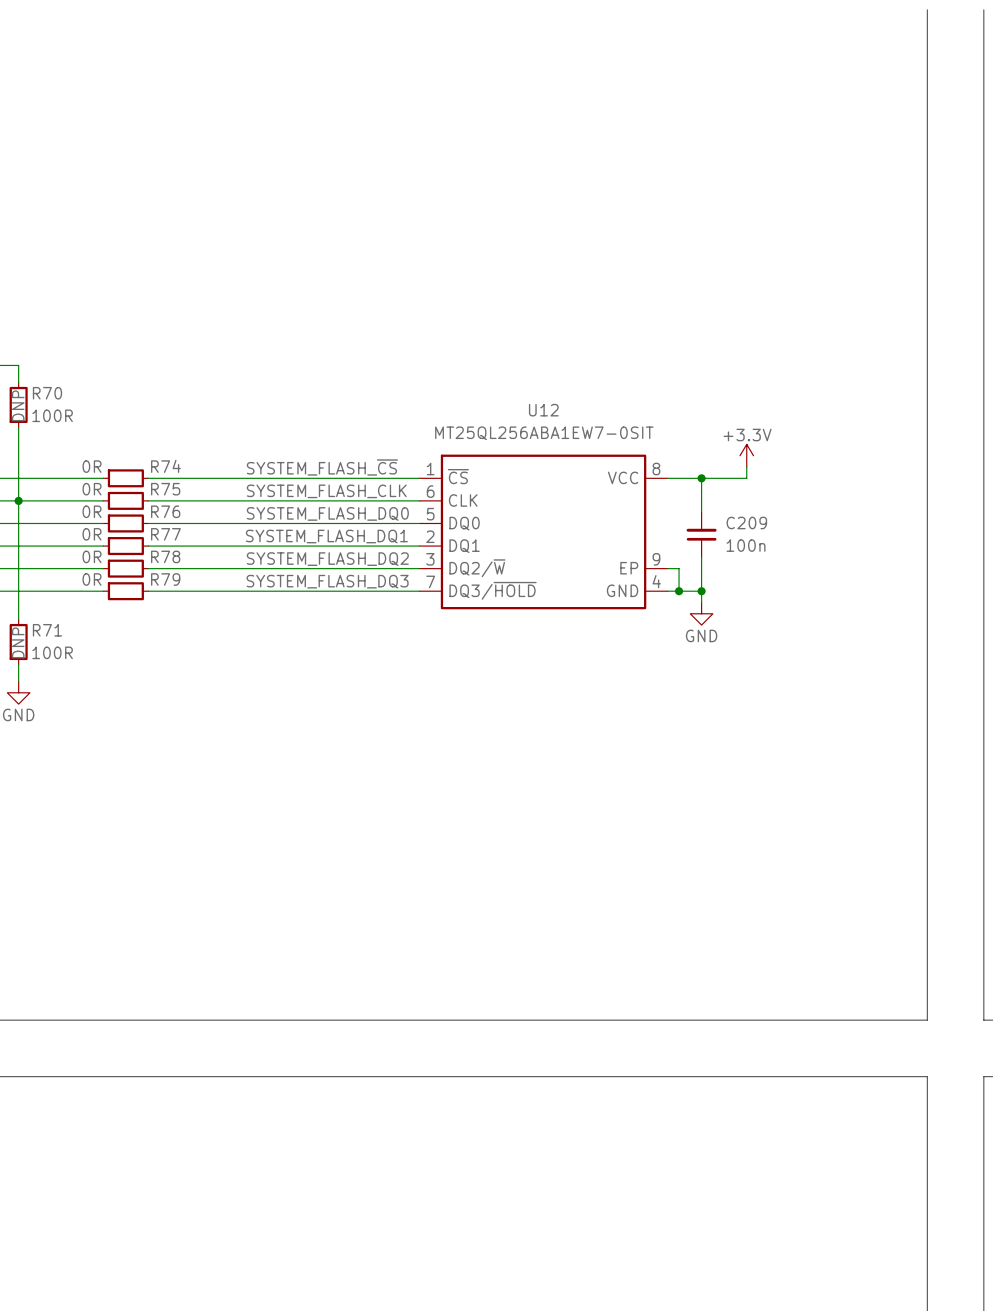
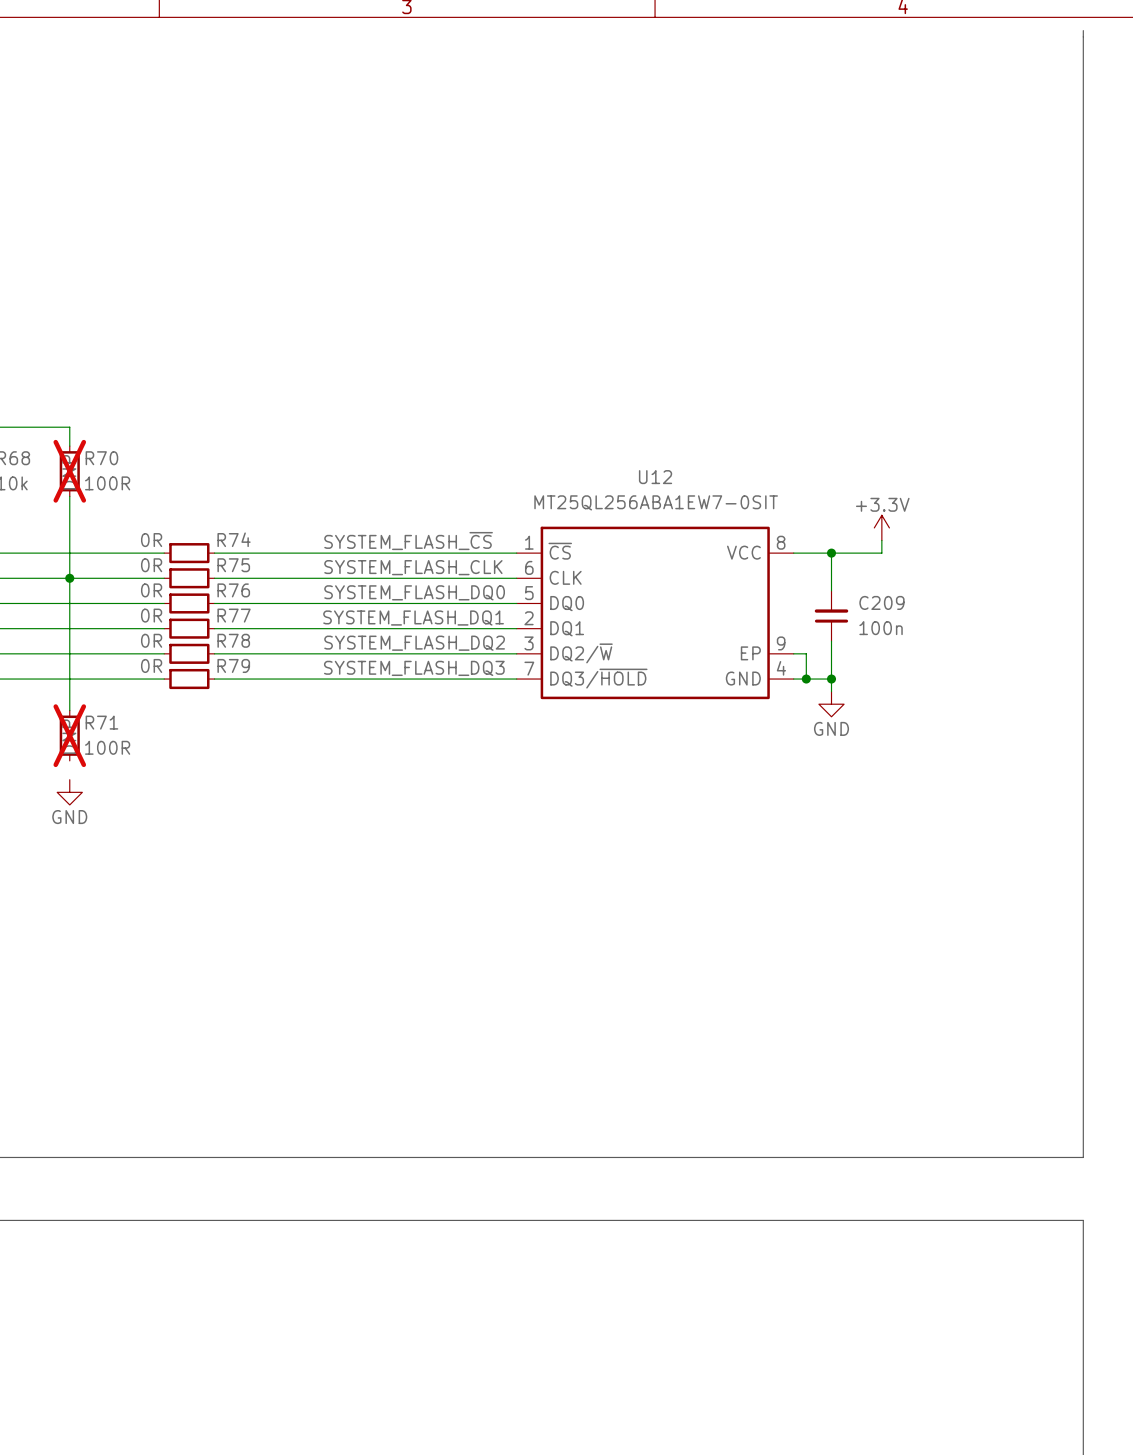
R70 do-not-place cross: none -> (69, 471)
R71 do-not-place cross: none -> (69, 735)
wire: (18, 664) (18, 681) -> none

